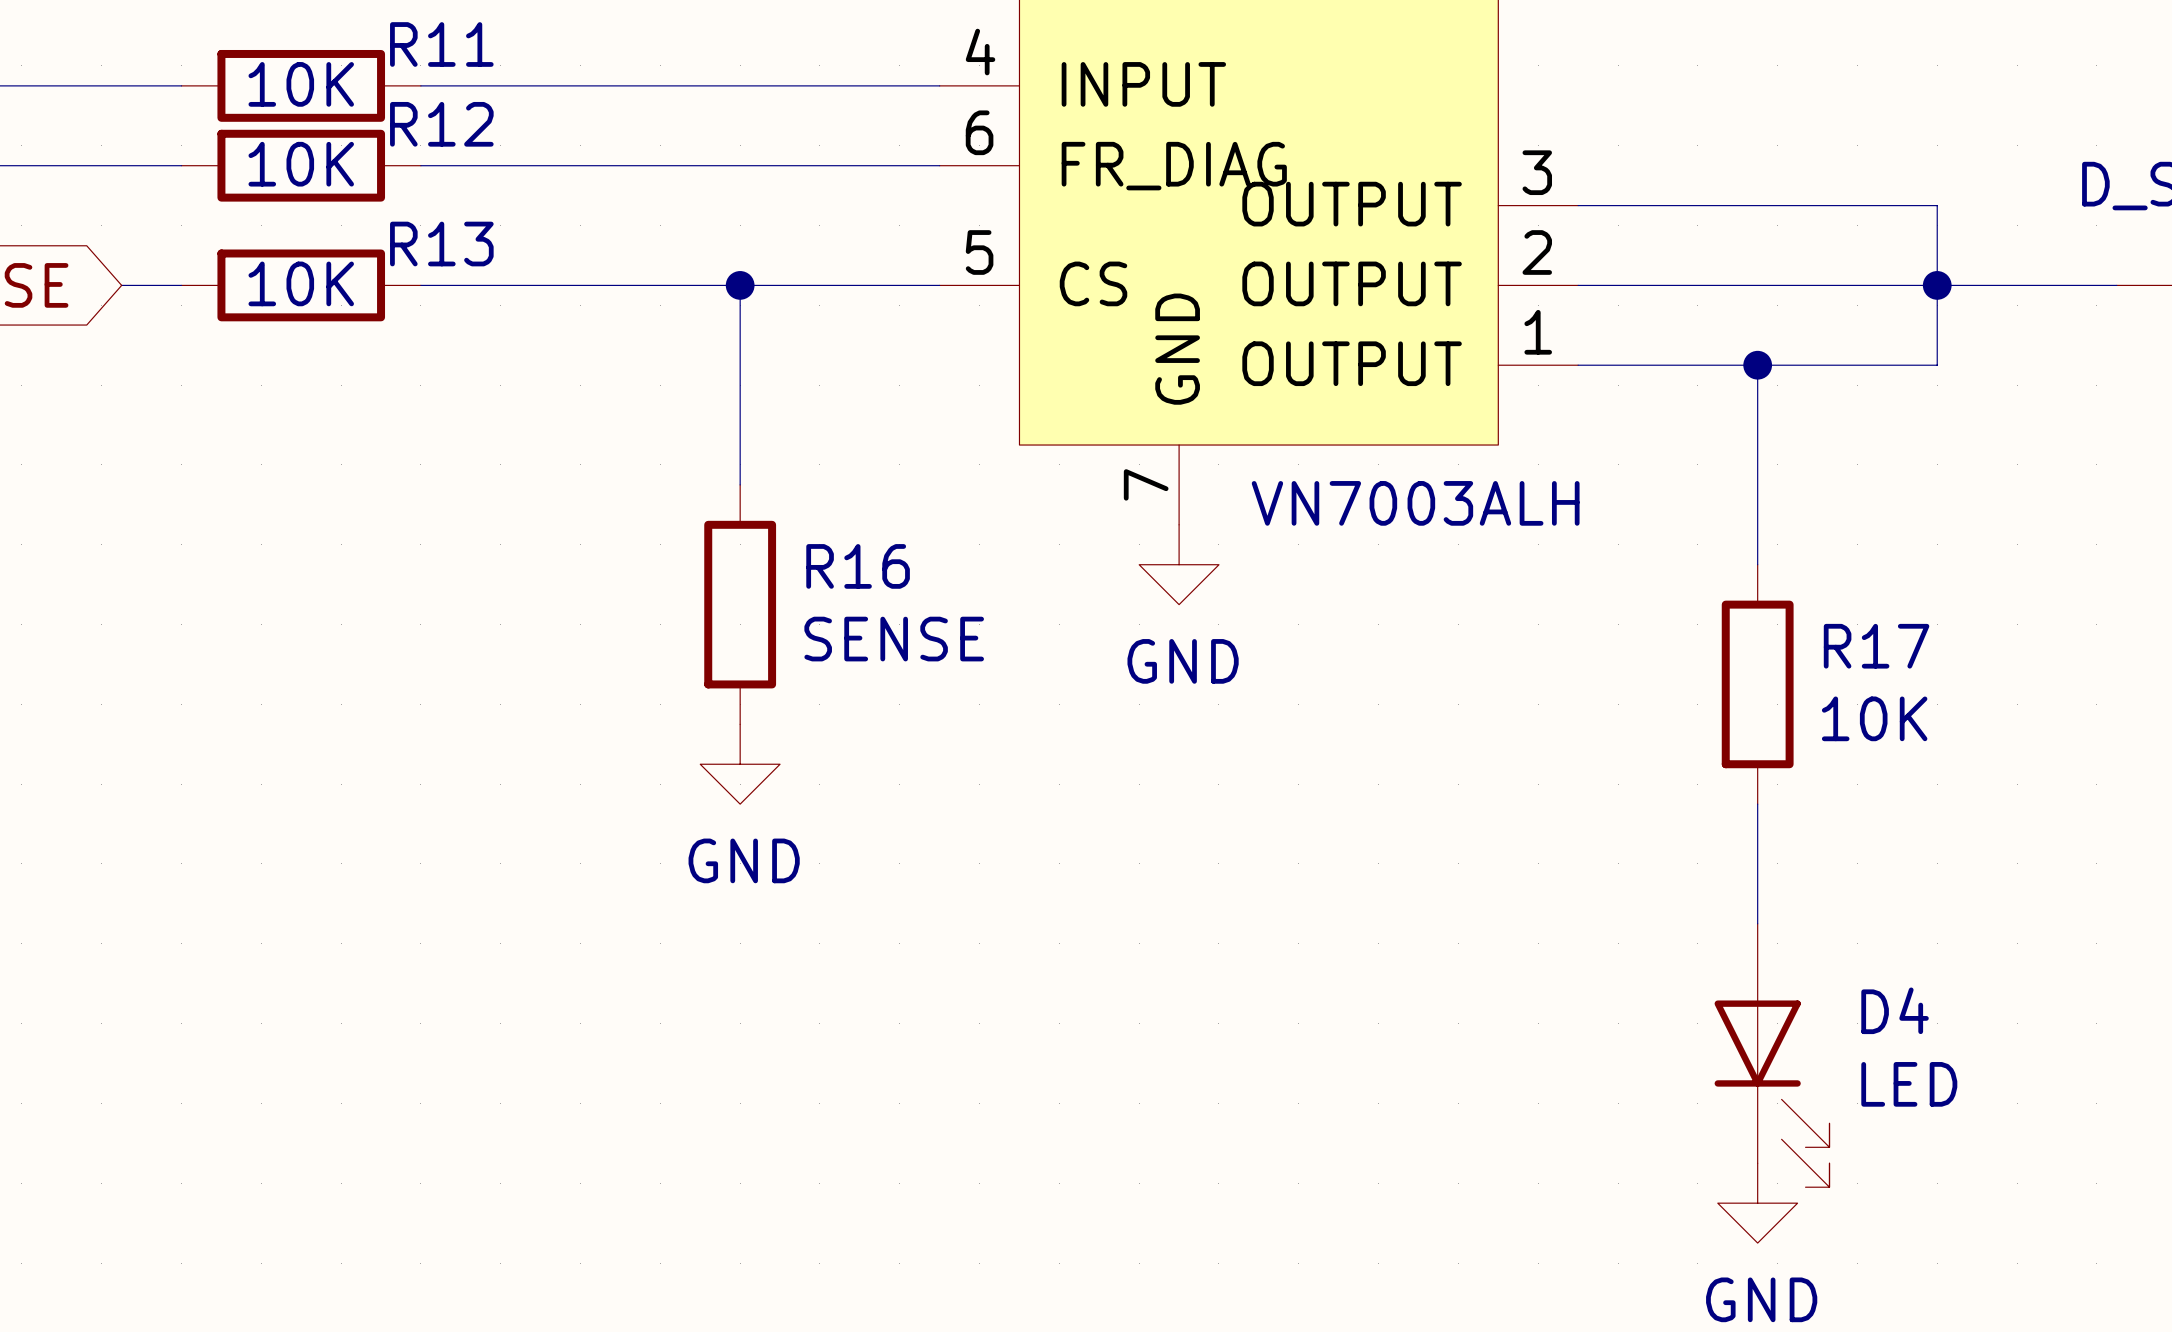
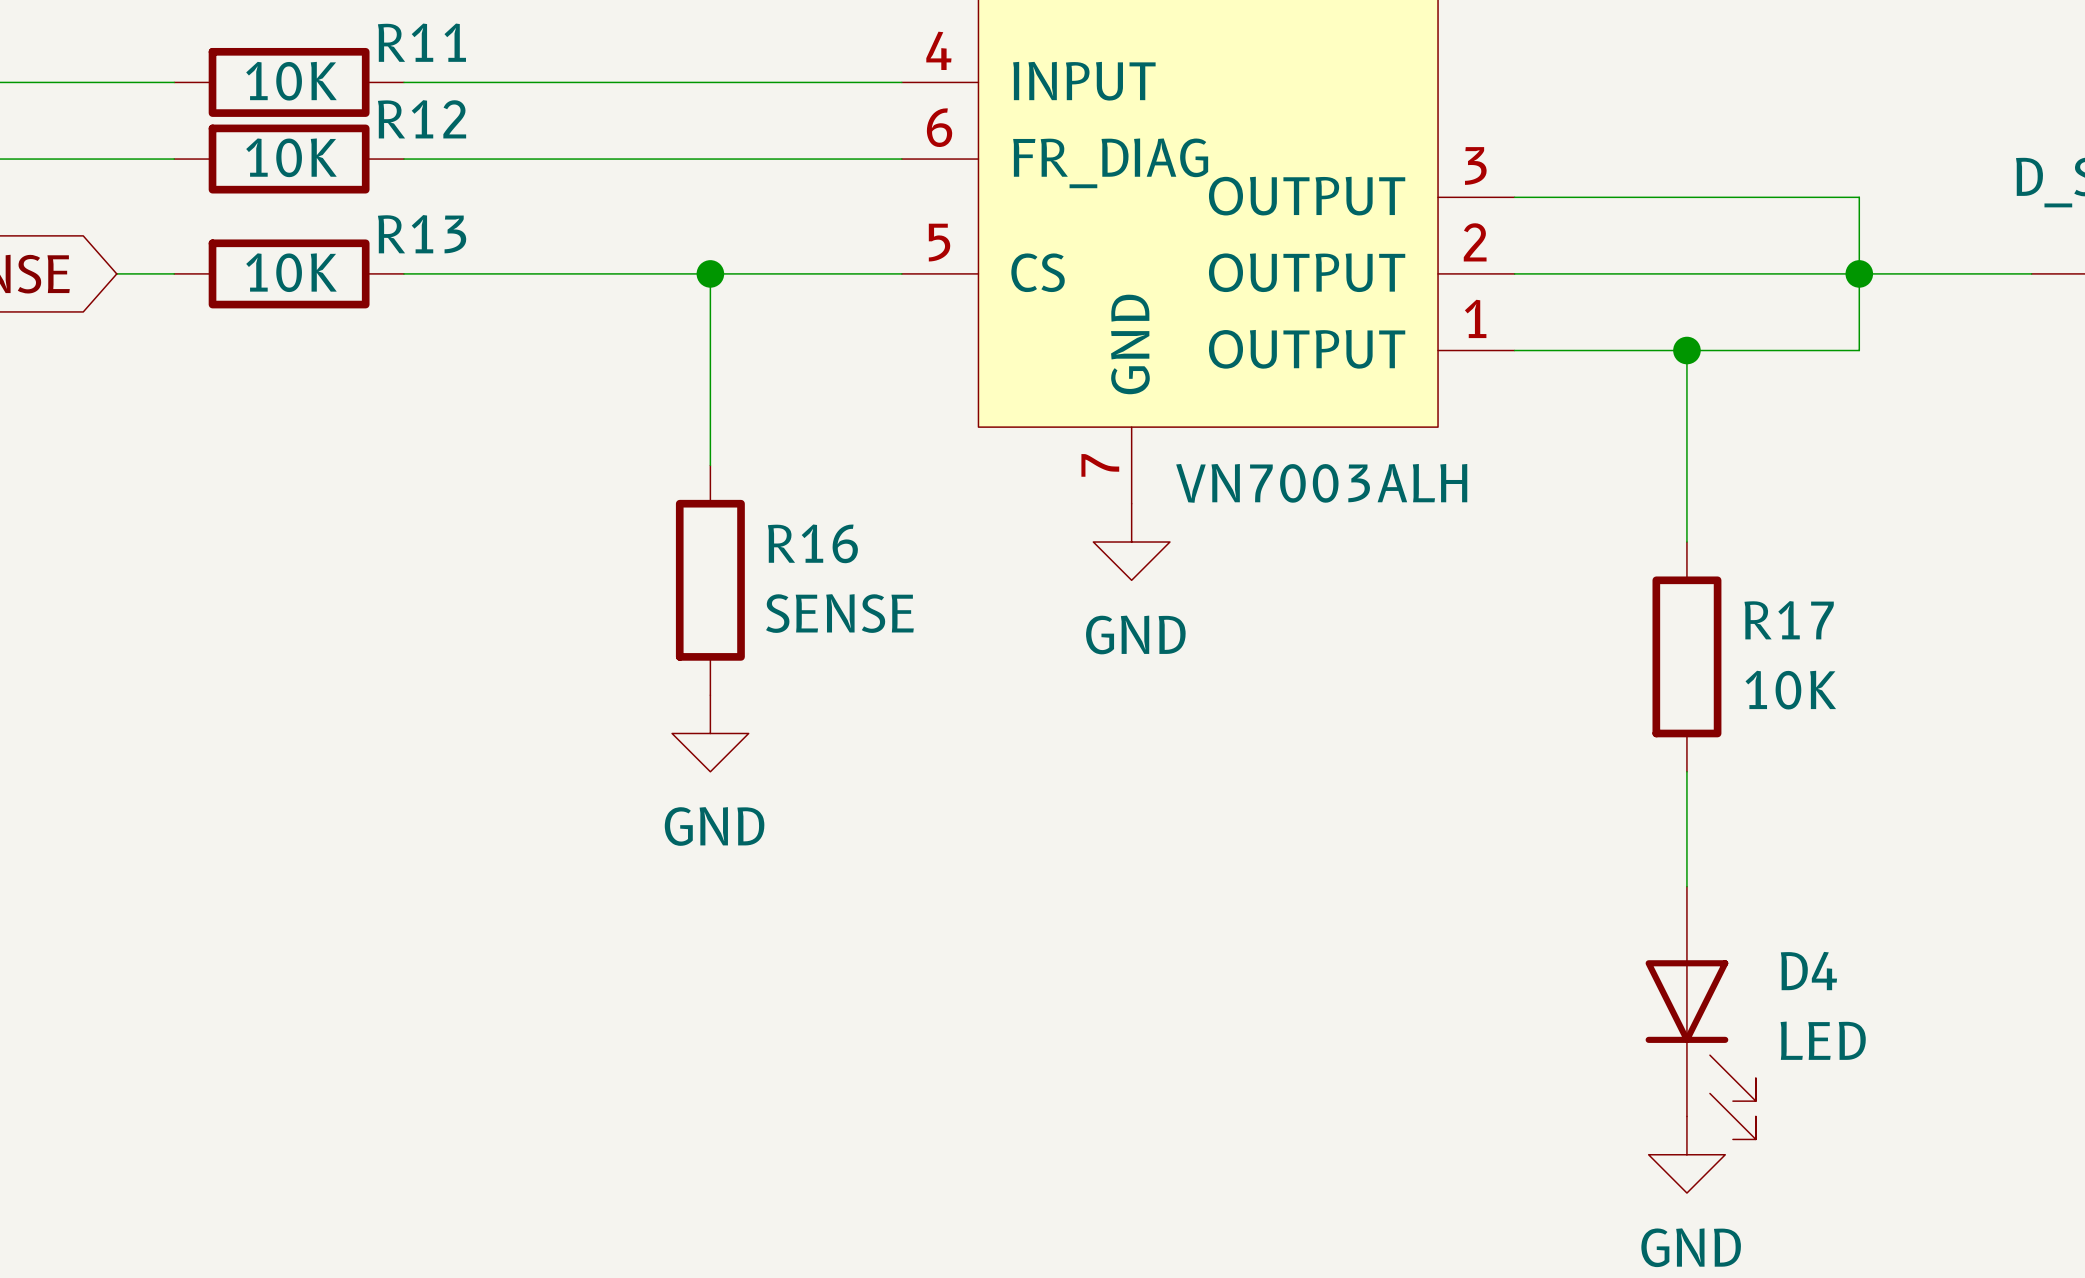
part value position: VN7003ALH (1415, 503) -> VN7003ALH (1321, 483)

